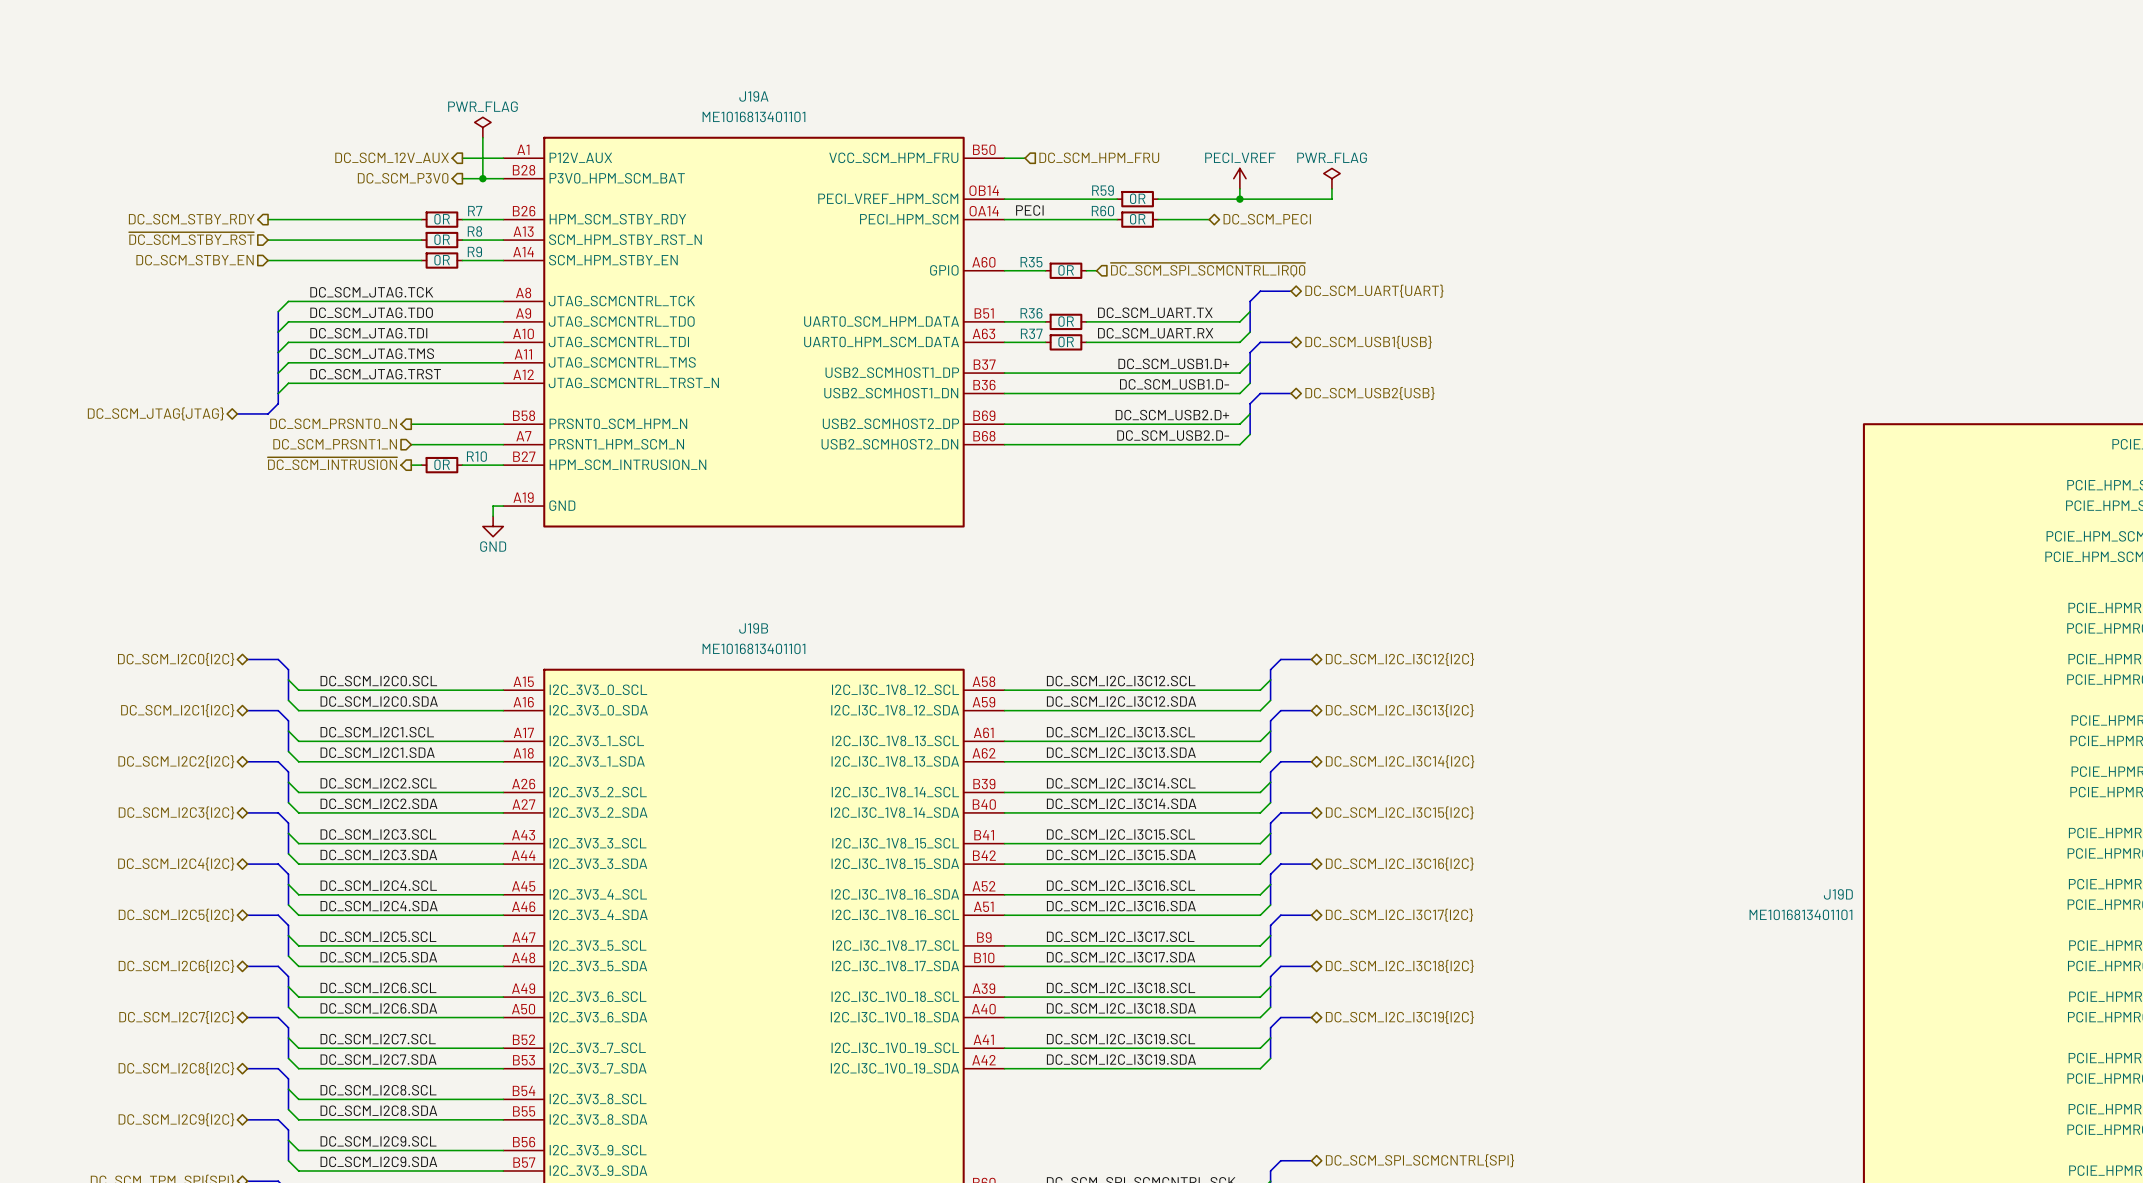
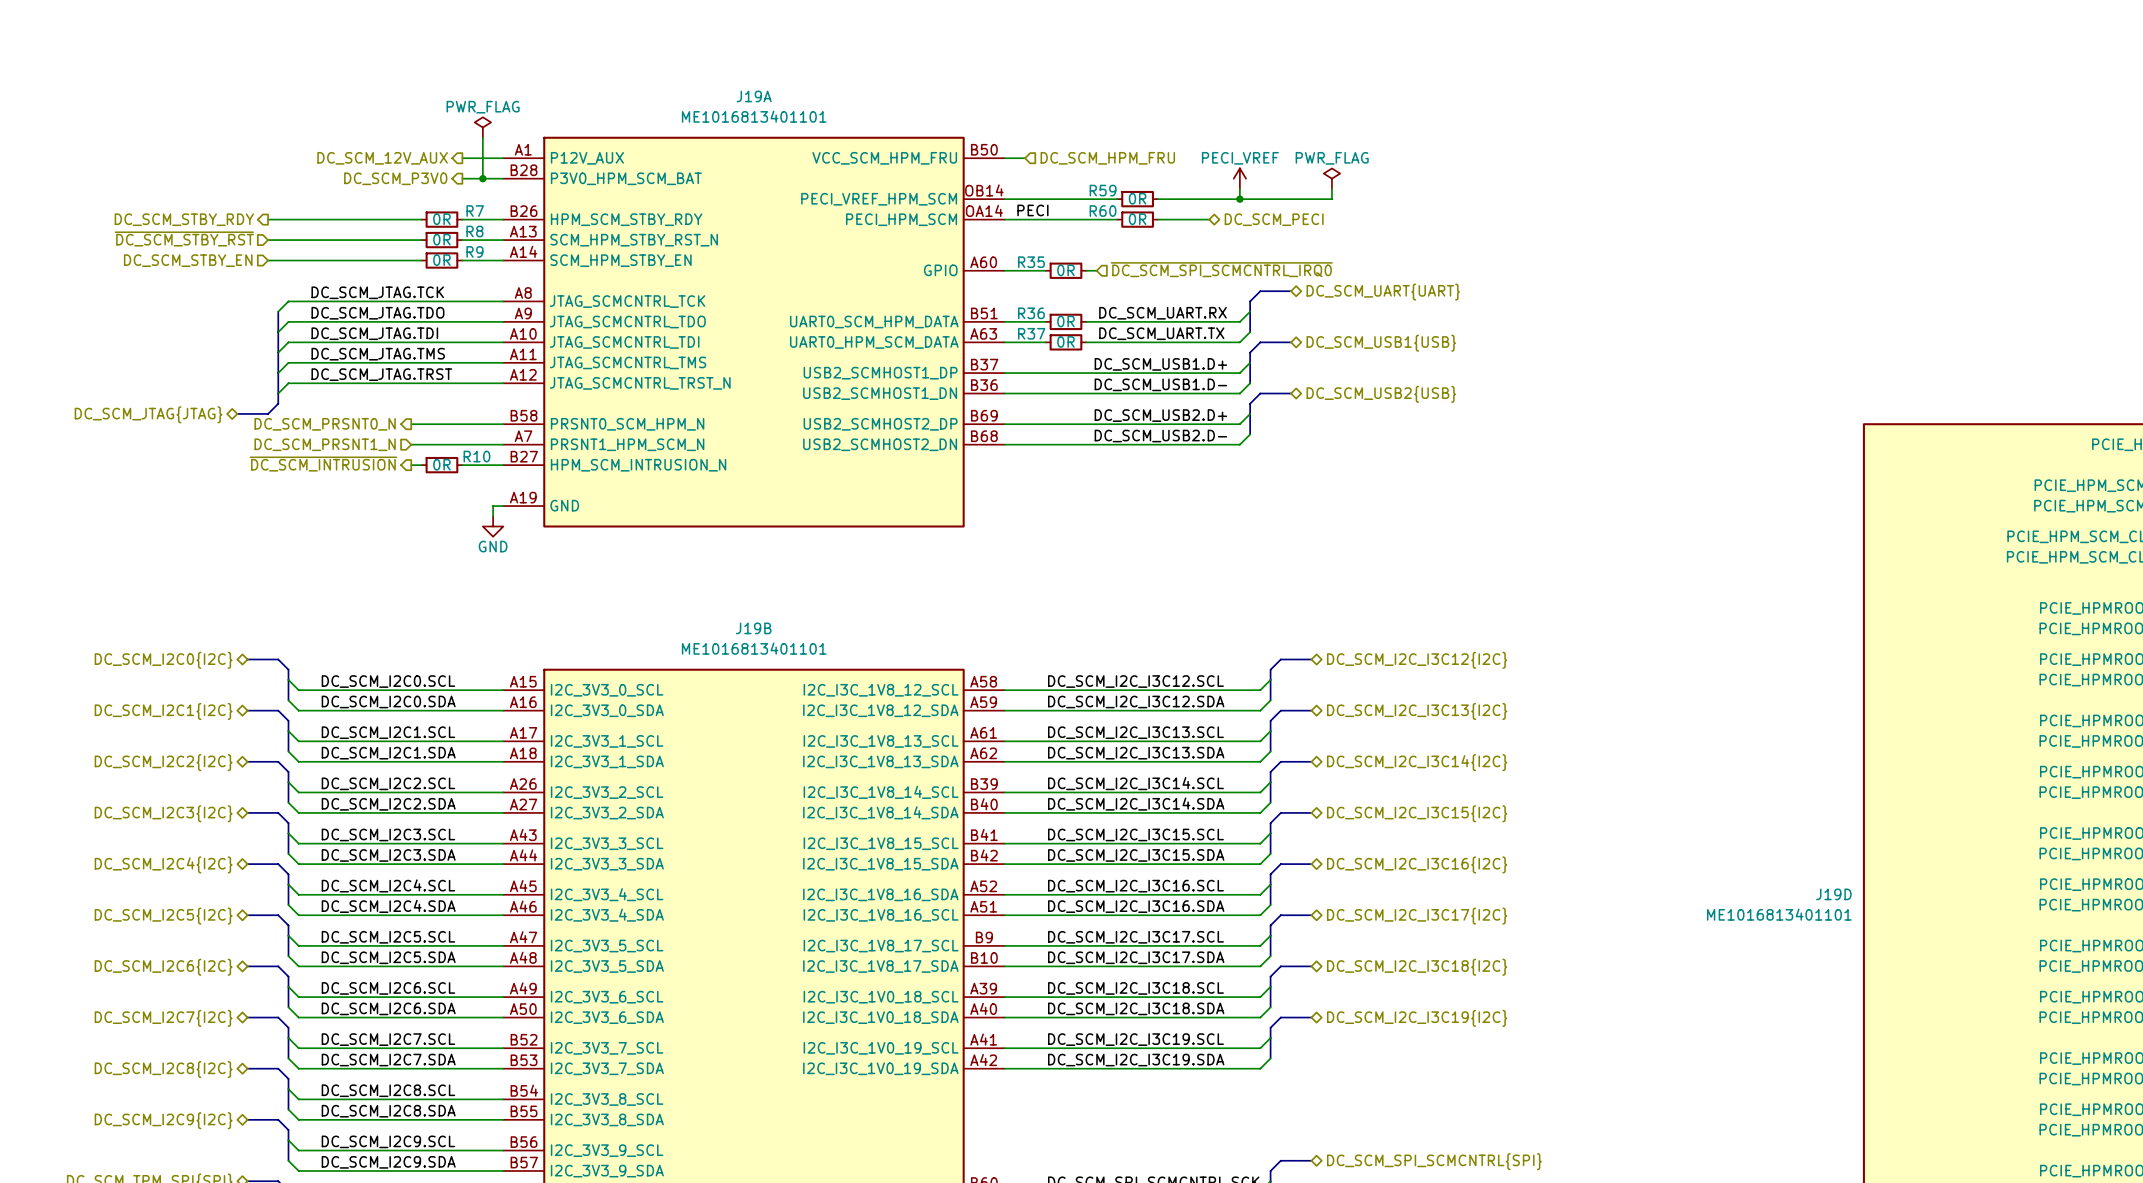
label: DC_SCM_UART.TX (1155, 312) -> DC_SCM_UART.RX (1163, 313)
label: DC_SCM_UART.RX (1155, 333) -> DC_SCM_UART.TX (1161, 333)

